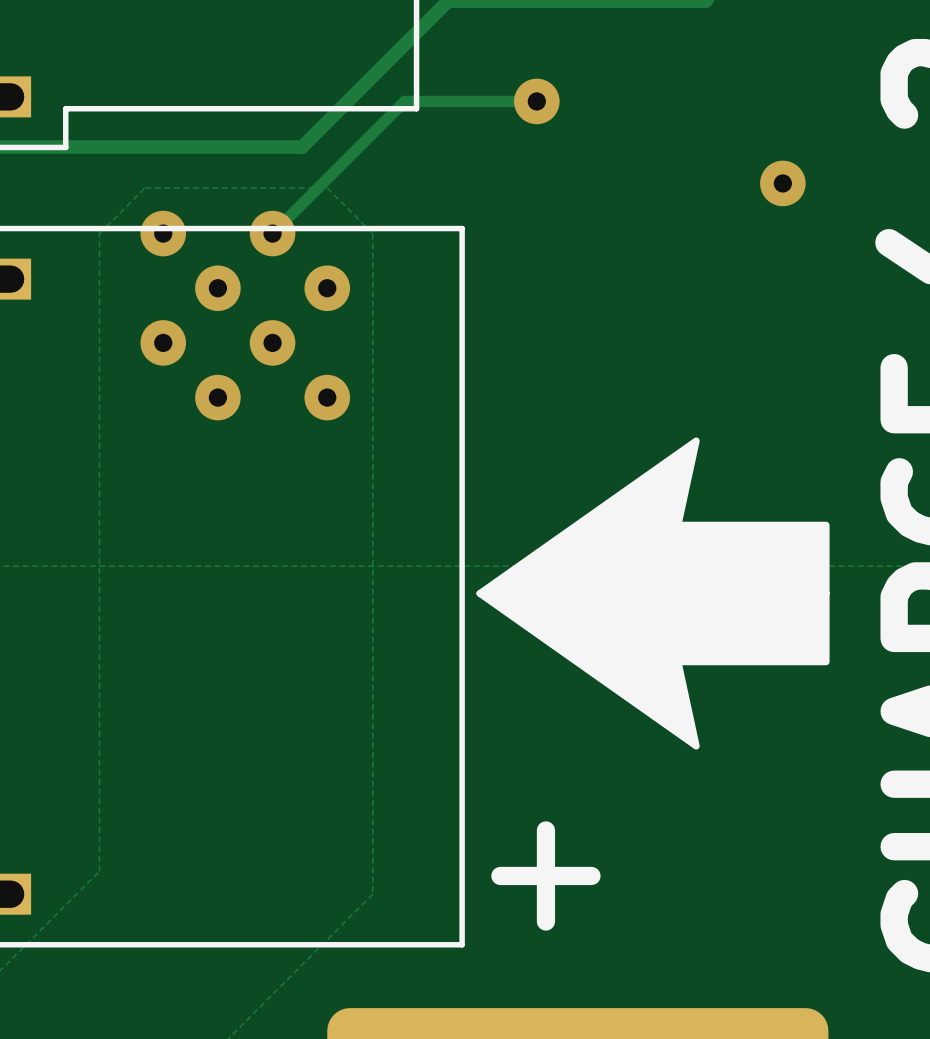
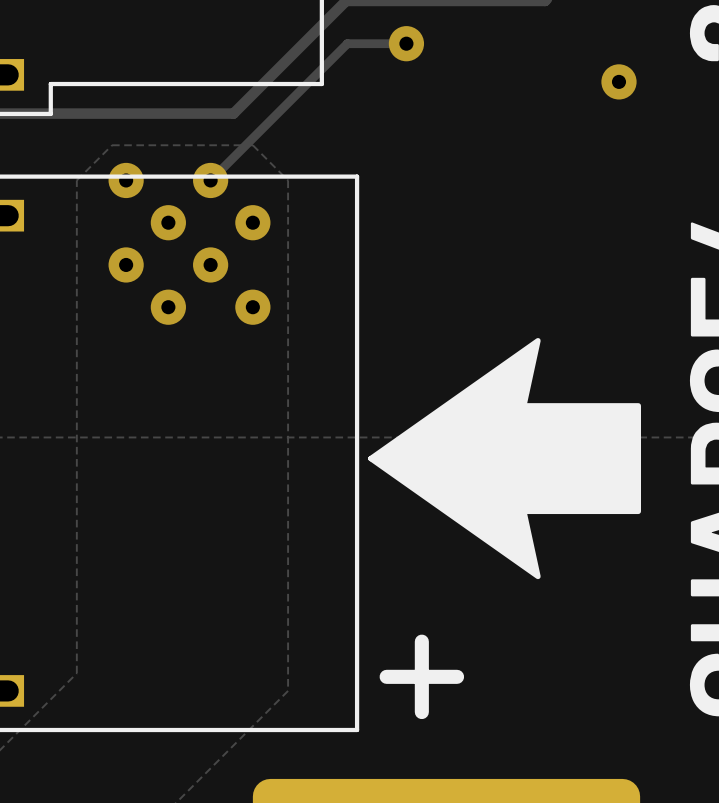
track: (404, 101) (536, 101) -> (312, 78) (347, 43) (406, 43)
via position: (536, 101) -> (406, 43)
via position: (782, 183) -> (618, 81)

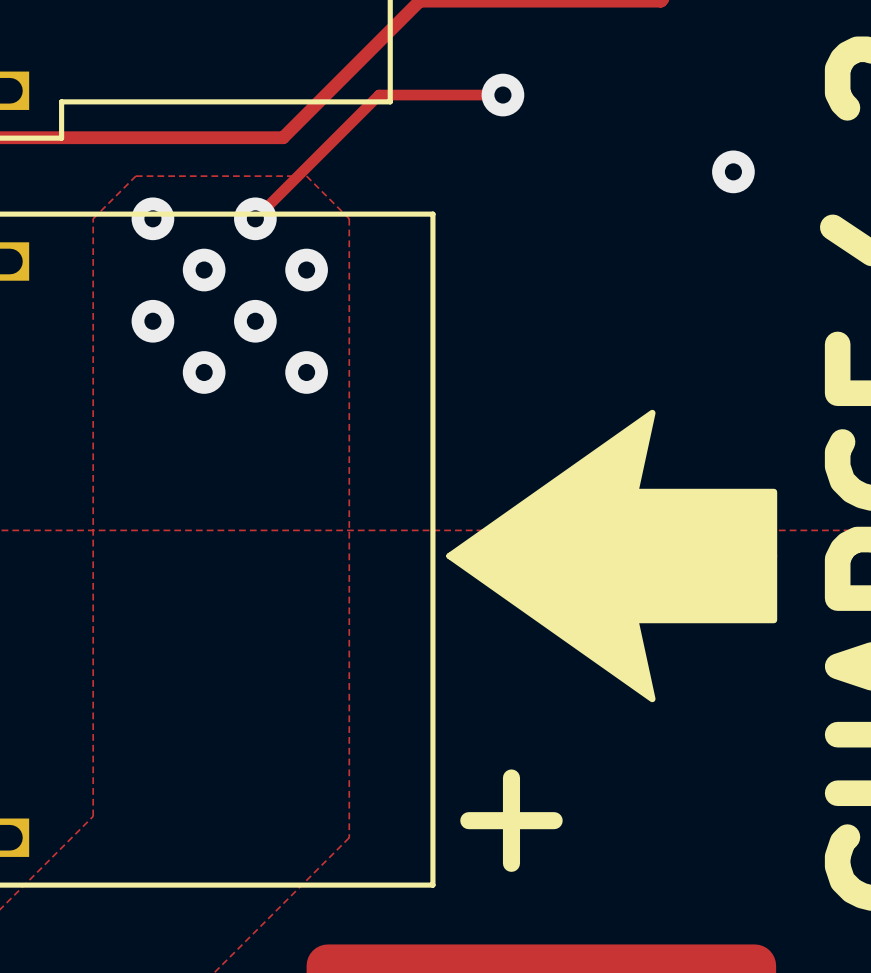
track: (406, 43) (347, 43) (312, 78) -> (502, 95) (379, 95)
via position: (406, 43) -> (502, 95)
via position: (618, 81) -> (733, 171)

